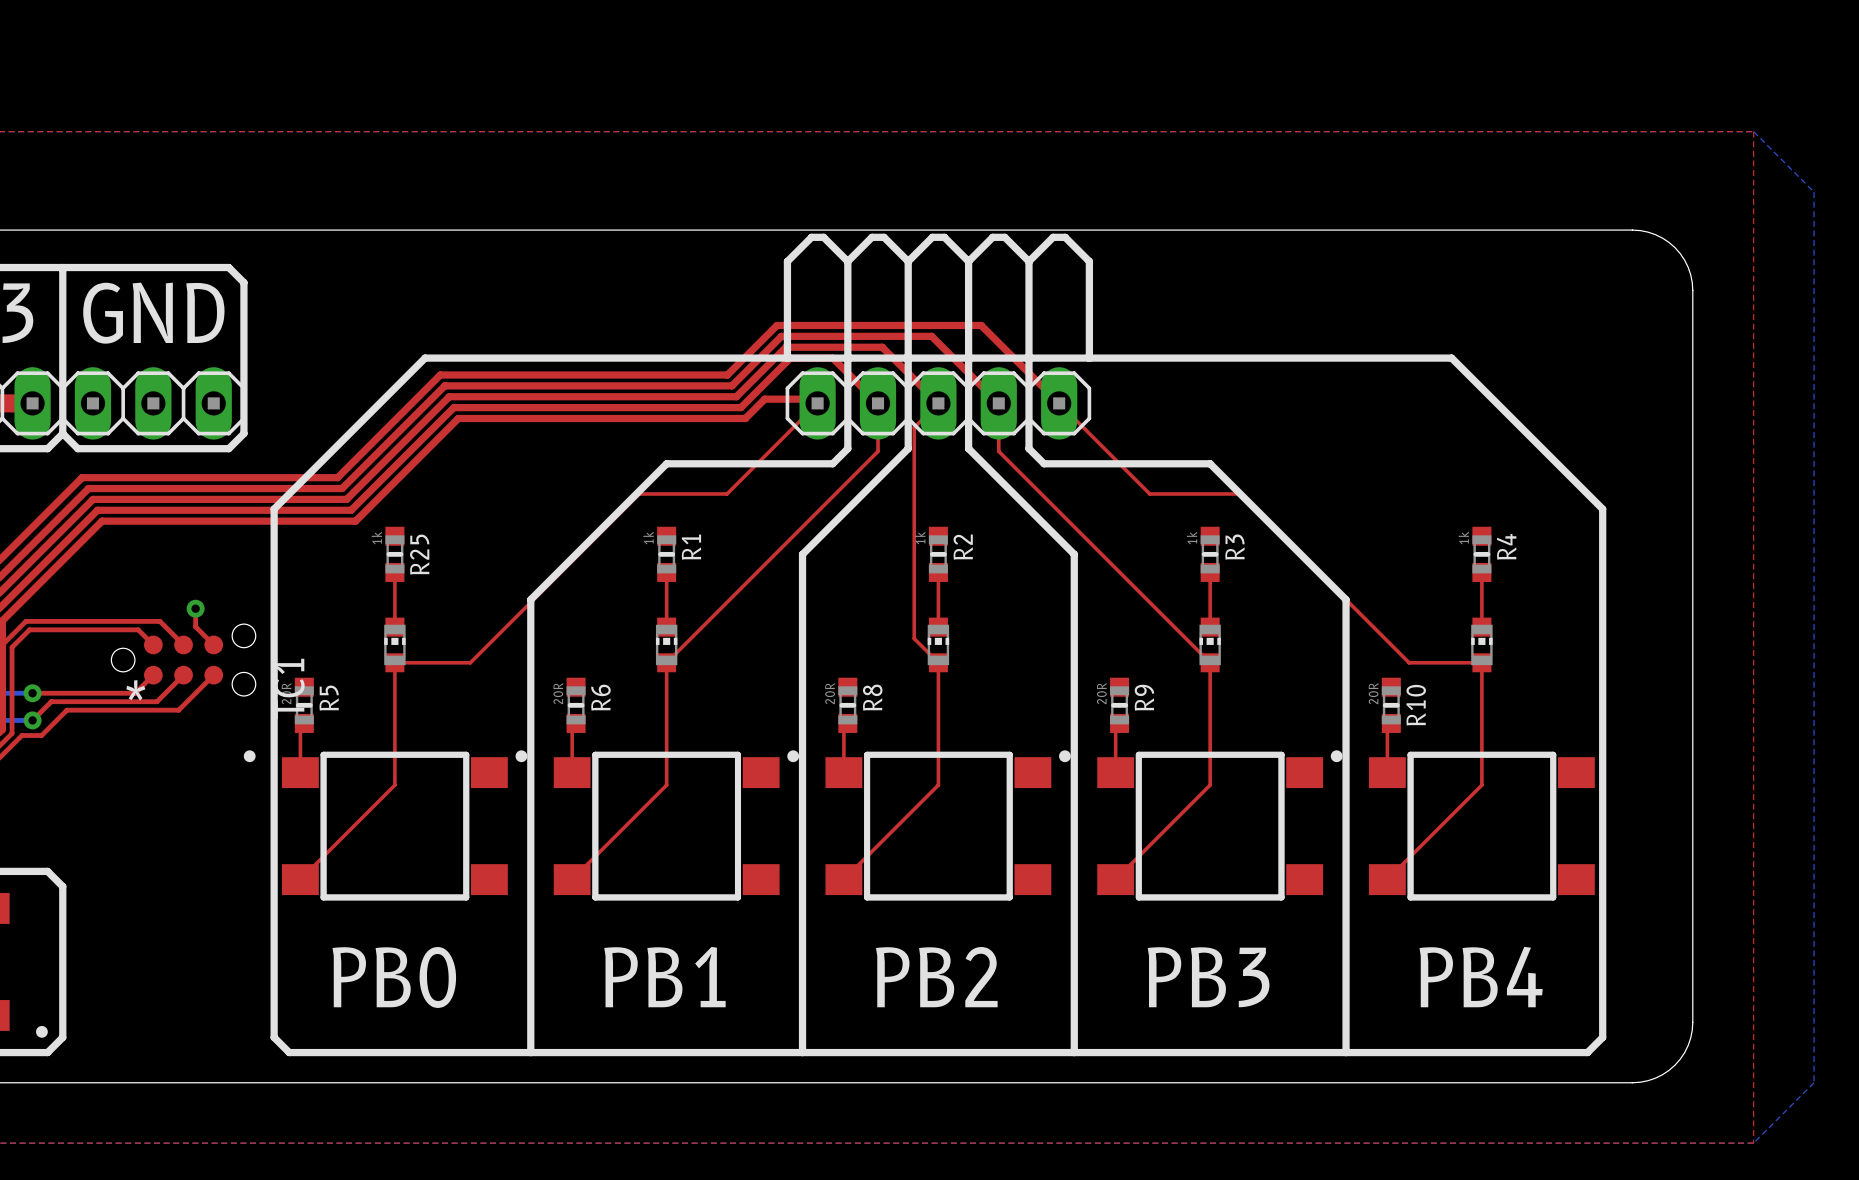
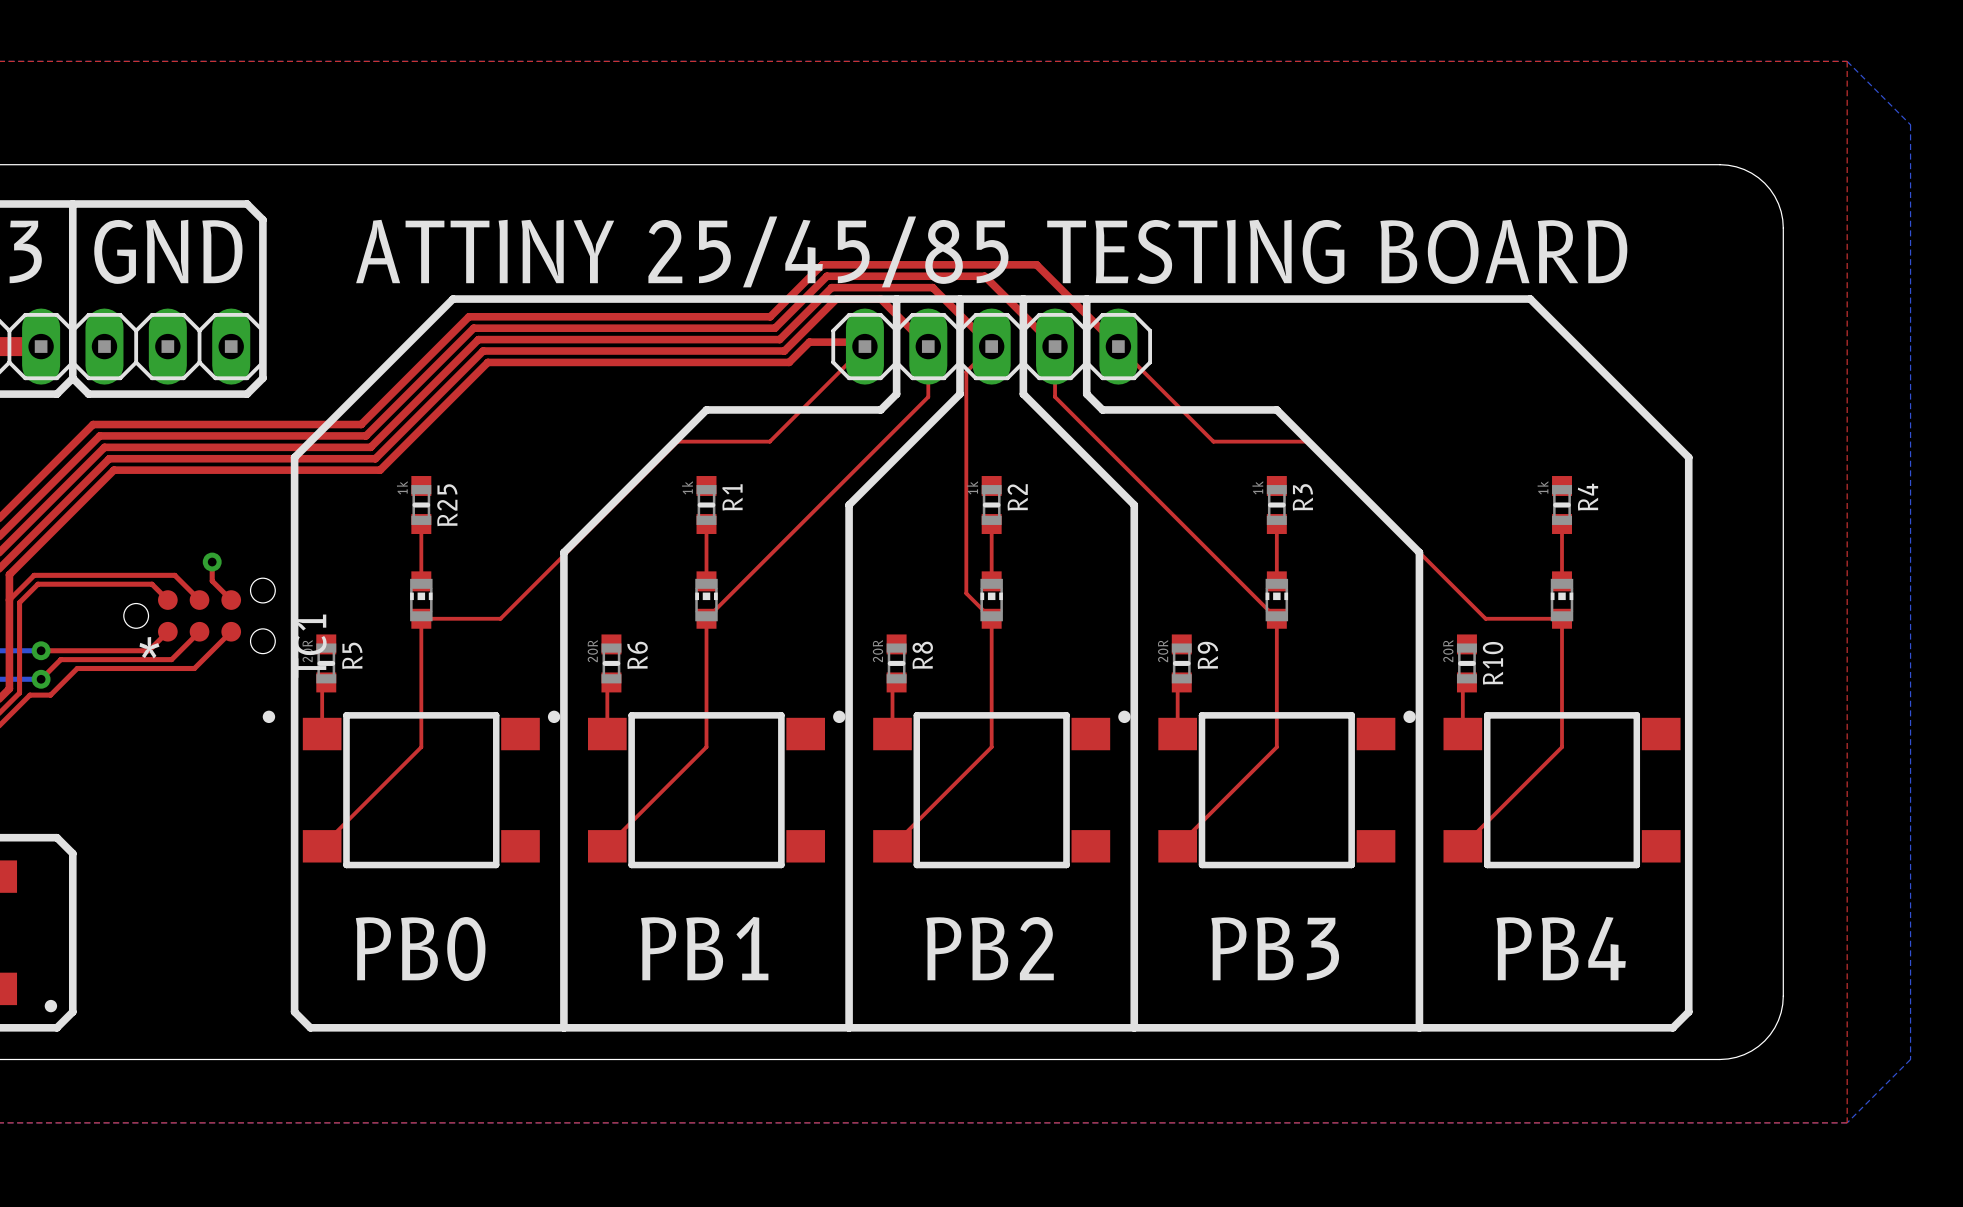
line: (847, 261) (847, 358) -> none
line: (847, 261) (871, 237) (884, 237) (908, 261) -> none
line: (847, 261) (823, 237) (811, 237) (787, 261) (787, 358) -> none
line: (908, 261) (908, 358) -> none
line: (908, 261) (932, 237) (944, 237) (968, 261) -> none
line: (968, 261) (968, 358) -> none
line: (968, 261) (992, 237) (1004, 237) (1028, 261) -> none
line: (1028, 261) (1028, 358) -> none
line: (1028, 261) (1053, 237) (1065, 237) (1089, 261) (1089, 358) -> none
text: none -> ATTINY 25/45/85 TESTING BOARD (991, 251)

